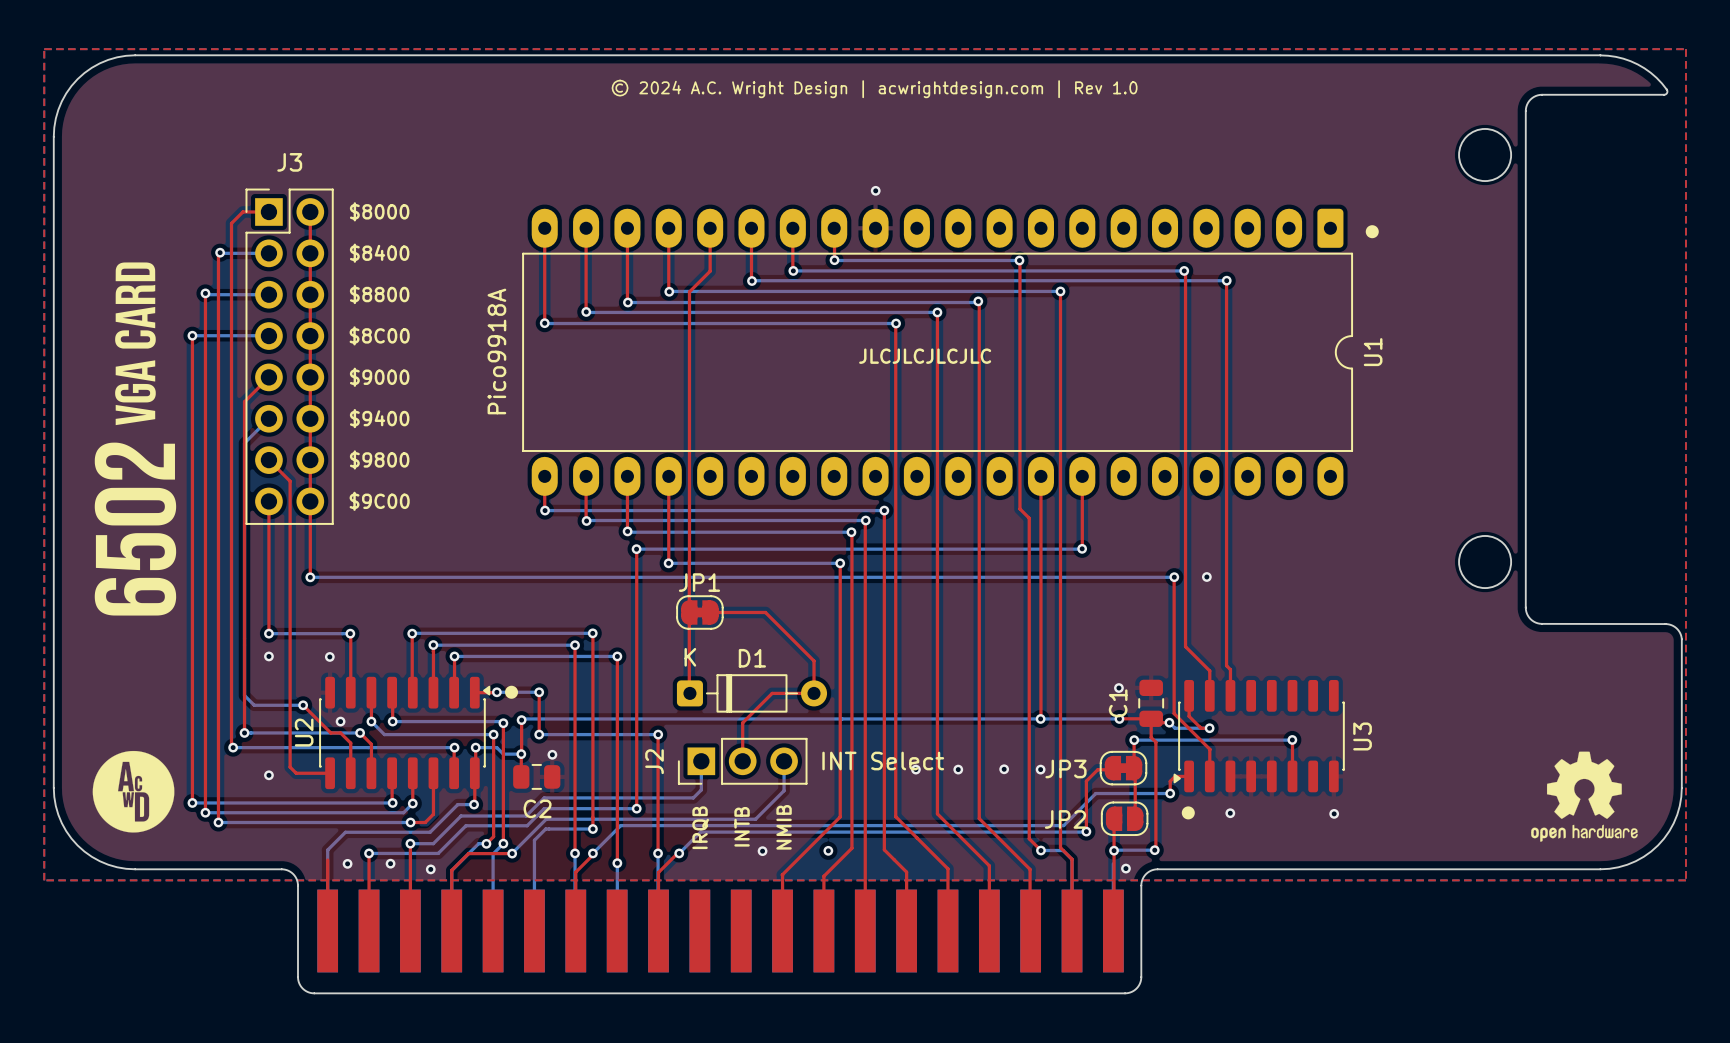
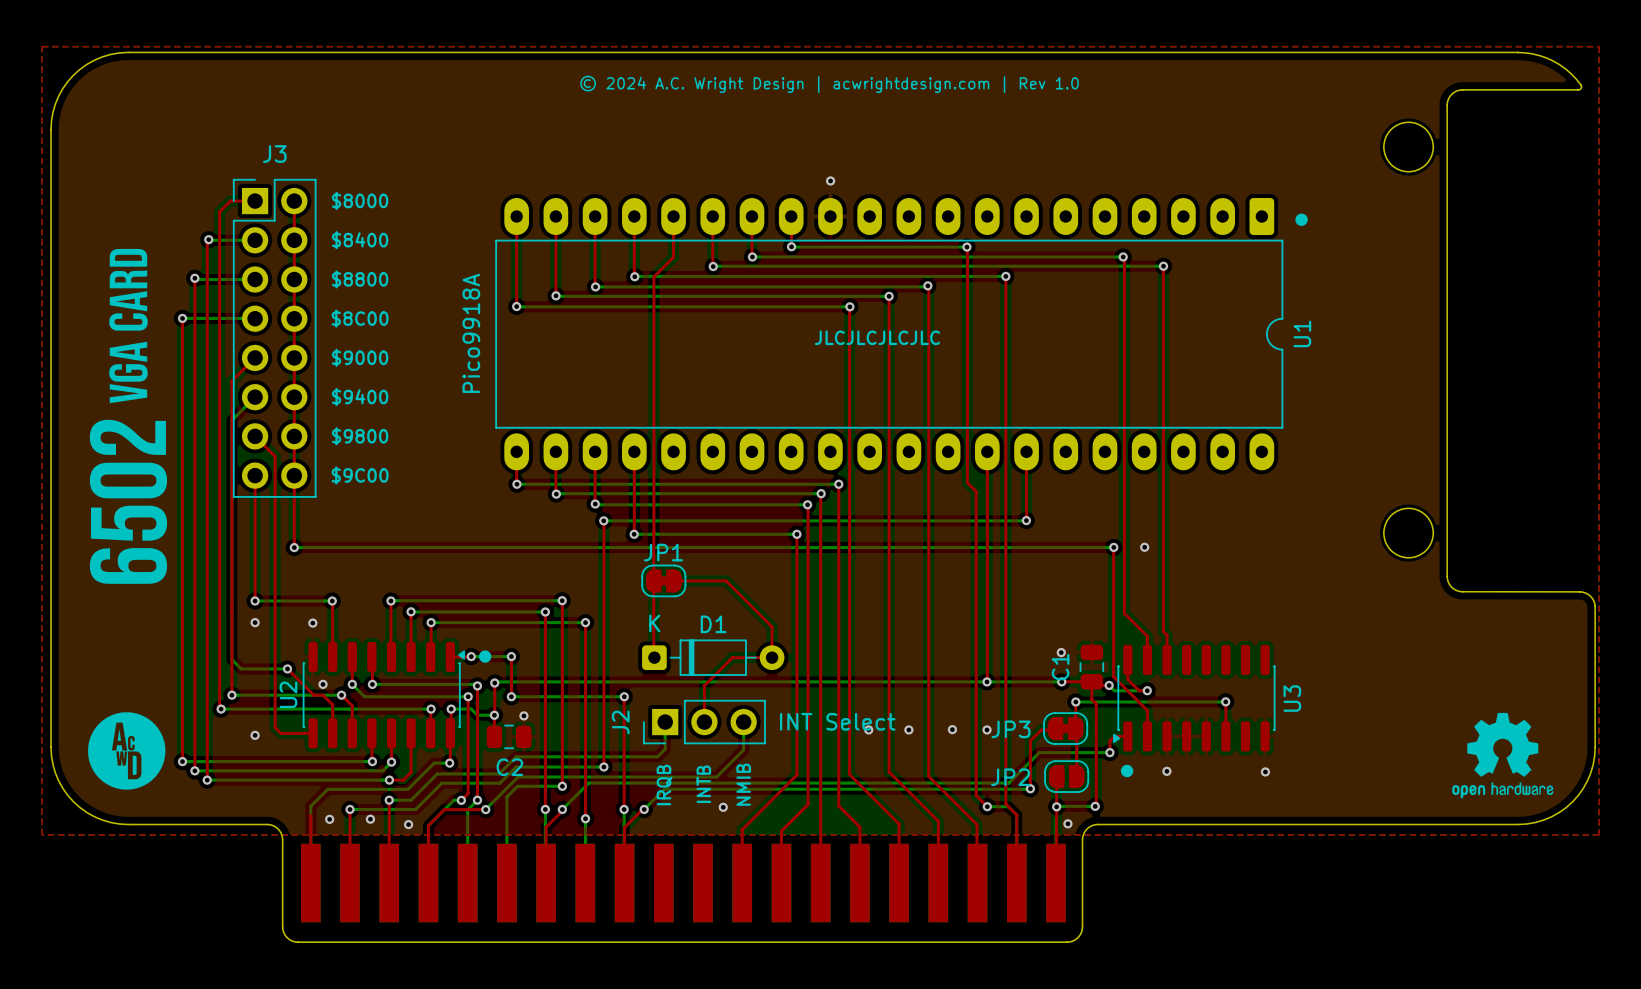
via: (828, 850) -> none

